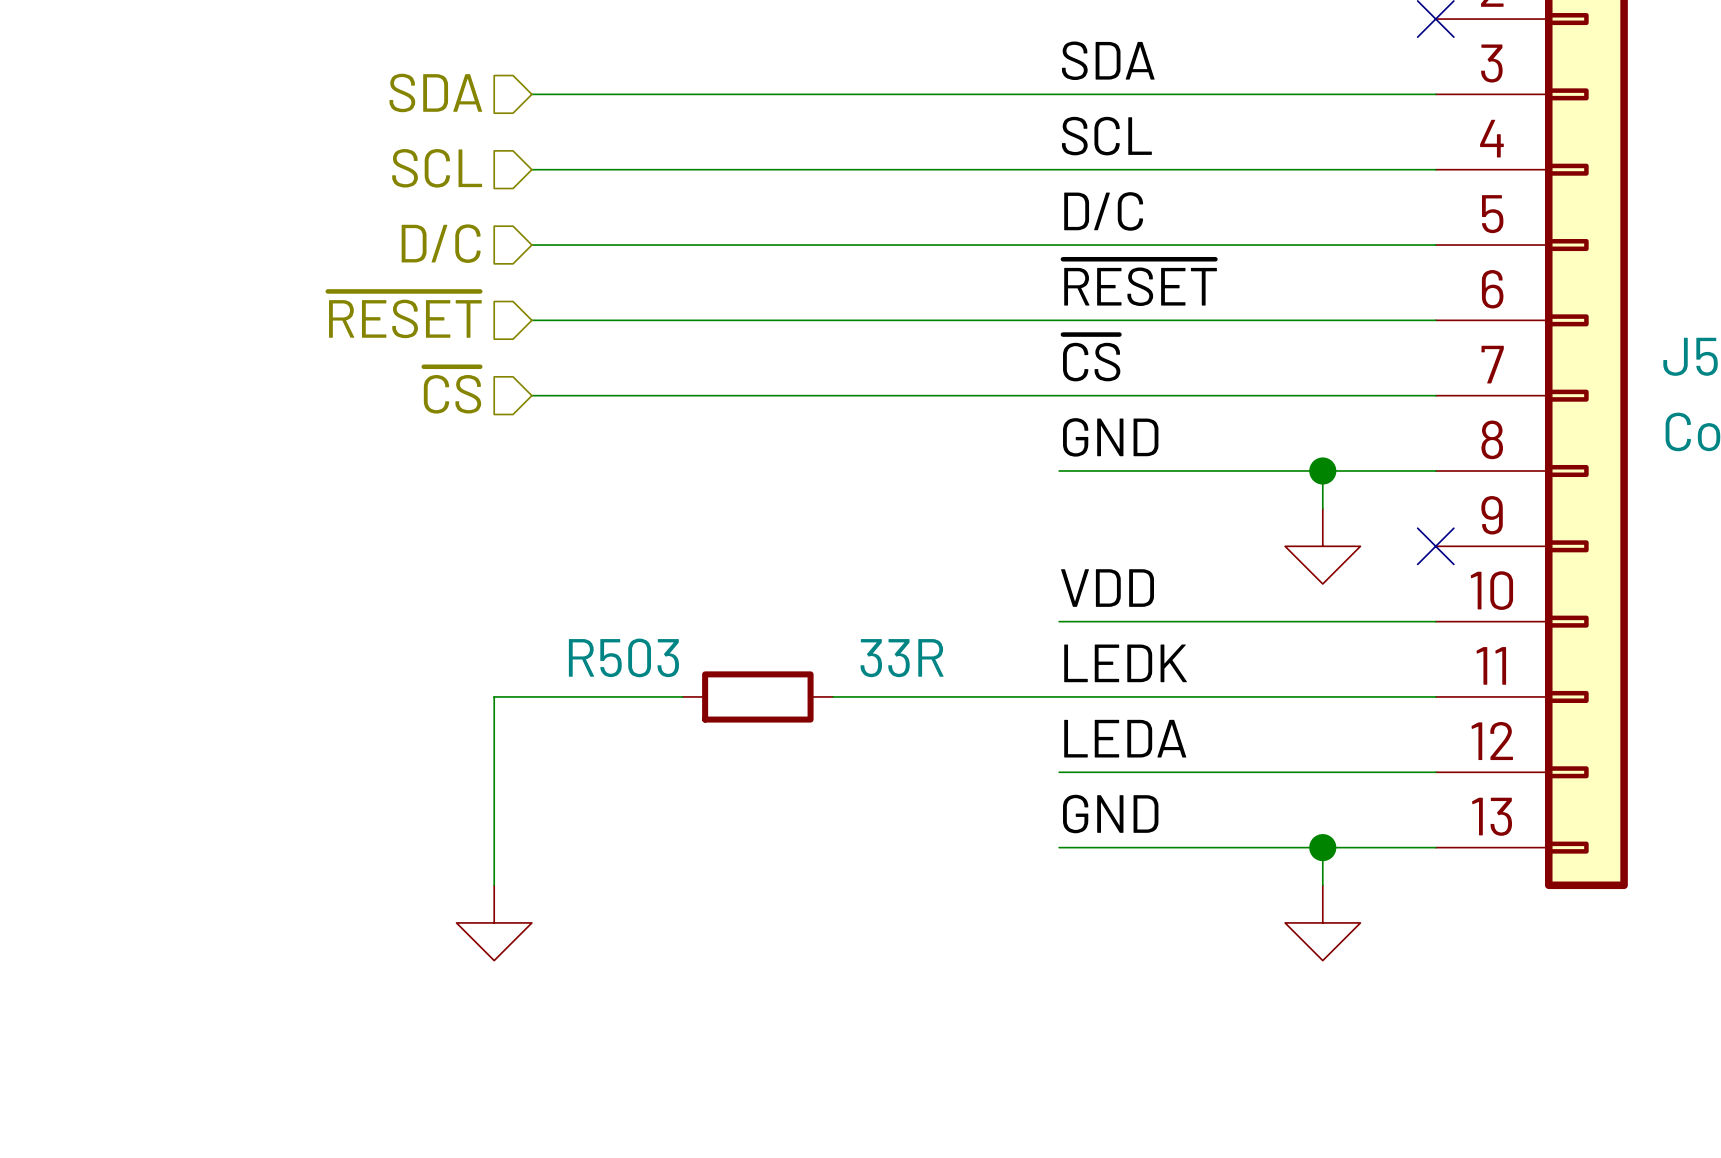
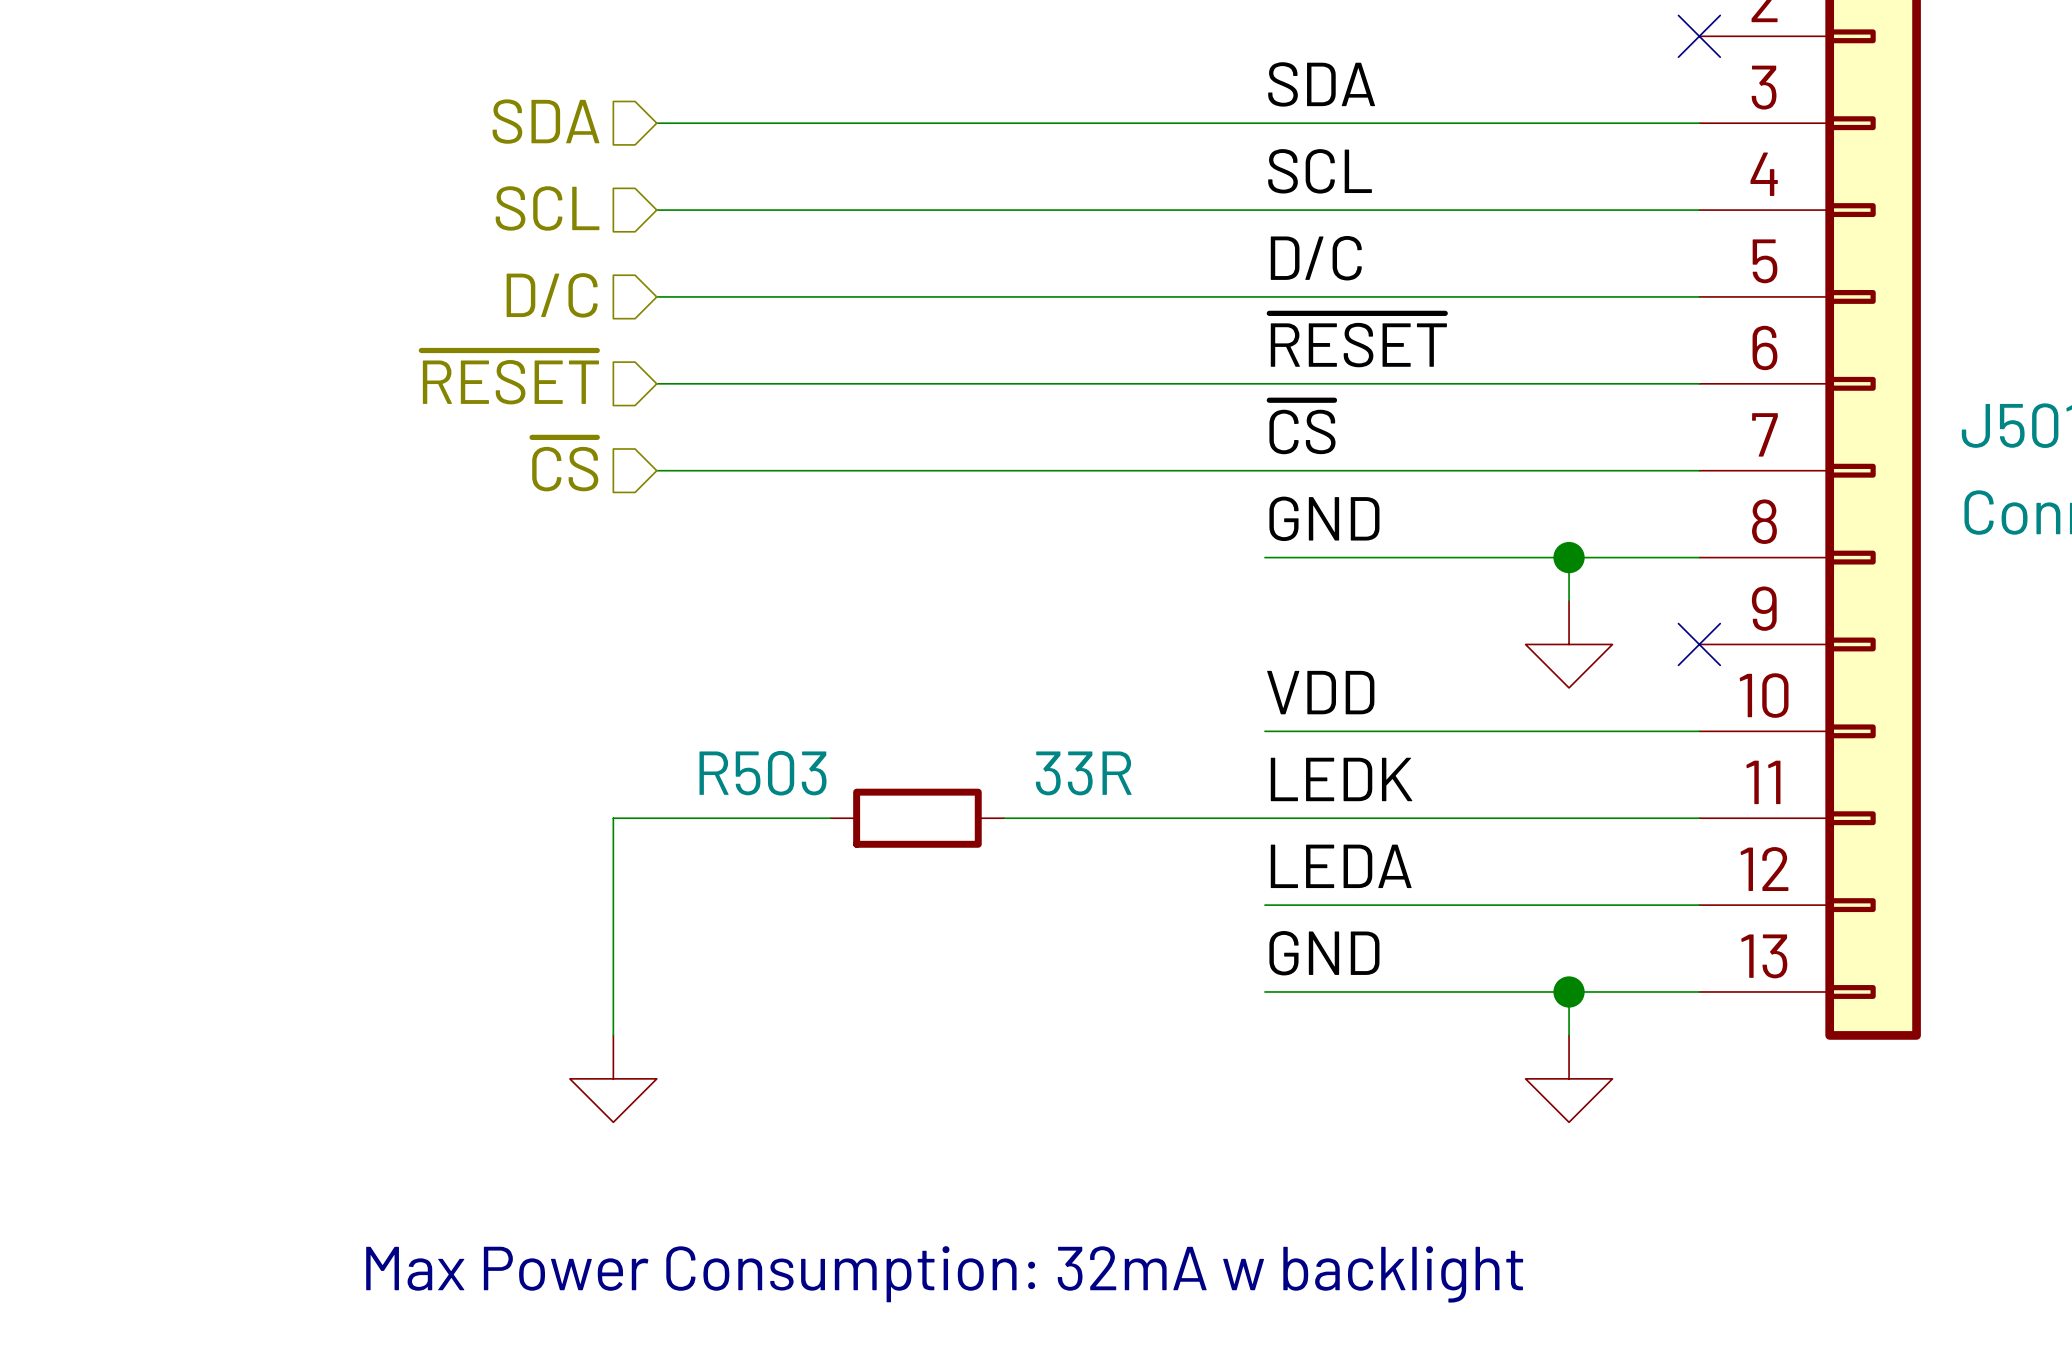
text: none -> Max Power Consumption: 32mA w backlight (944, 1274)

